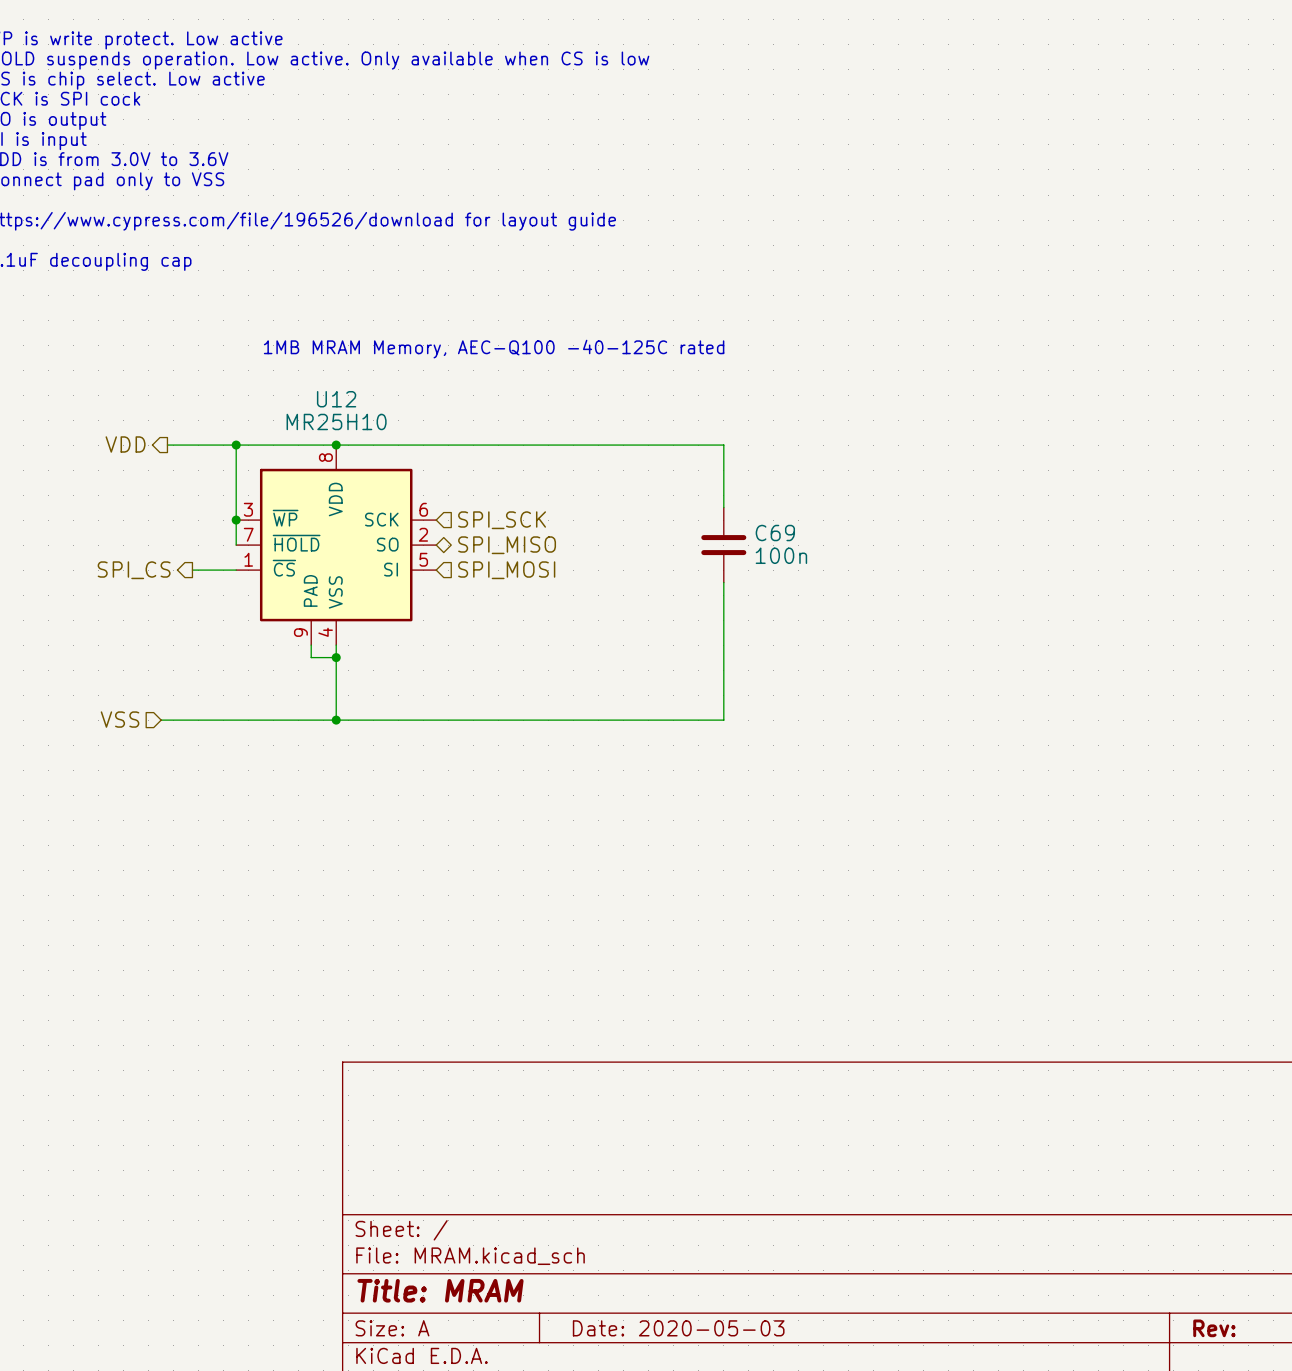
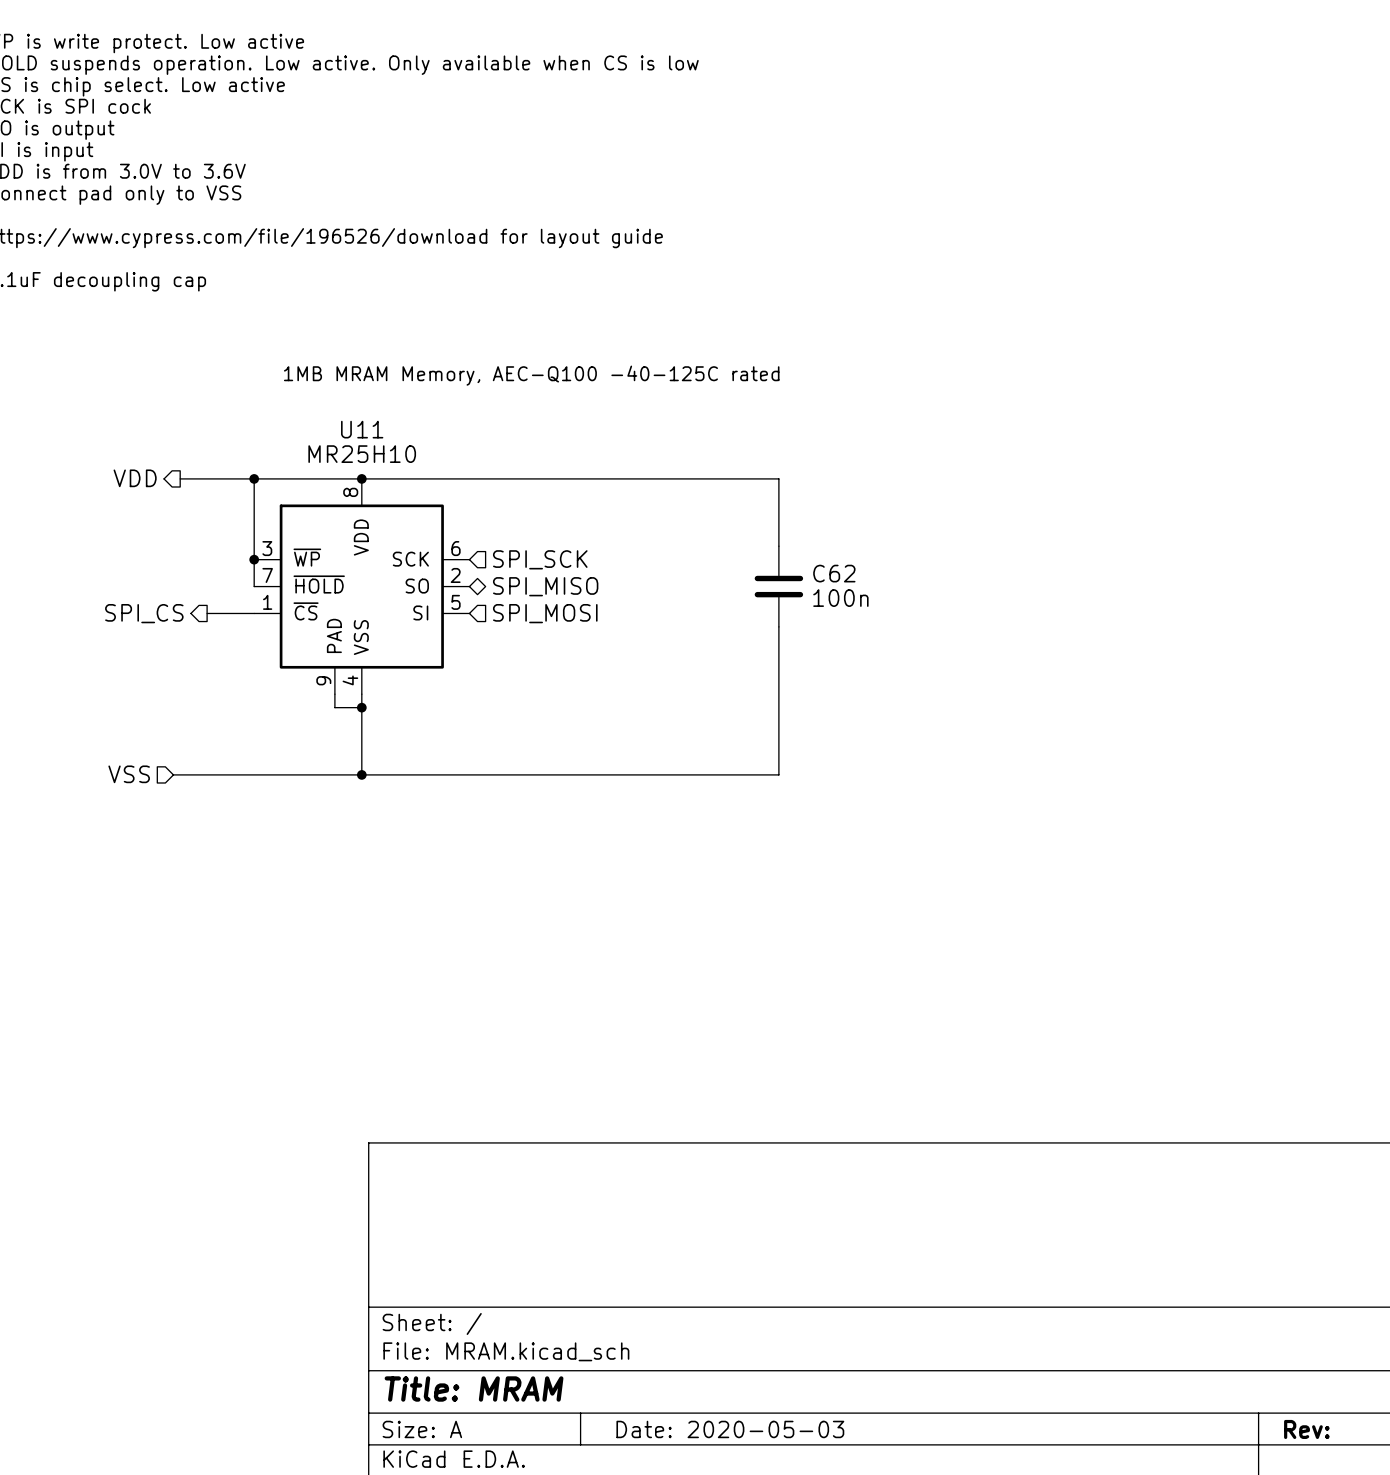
U12 name: U12 (336, 399) -> U11 (362, 429)
C69 name: C69 (775, 533) -> C62 (834, 573)

